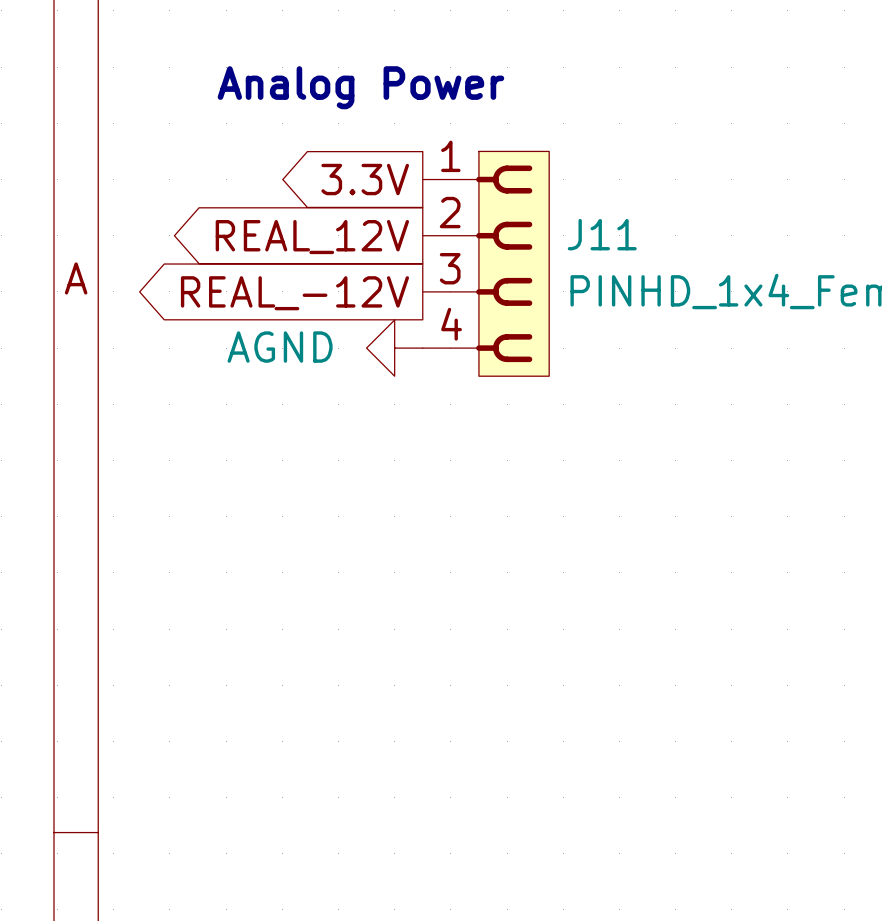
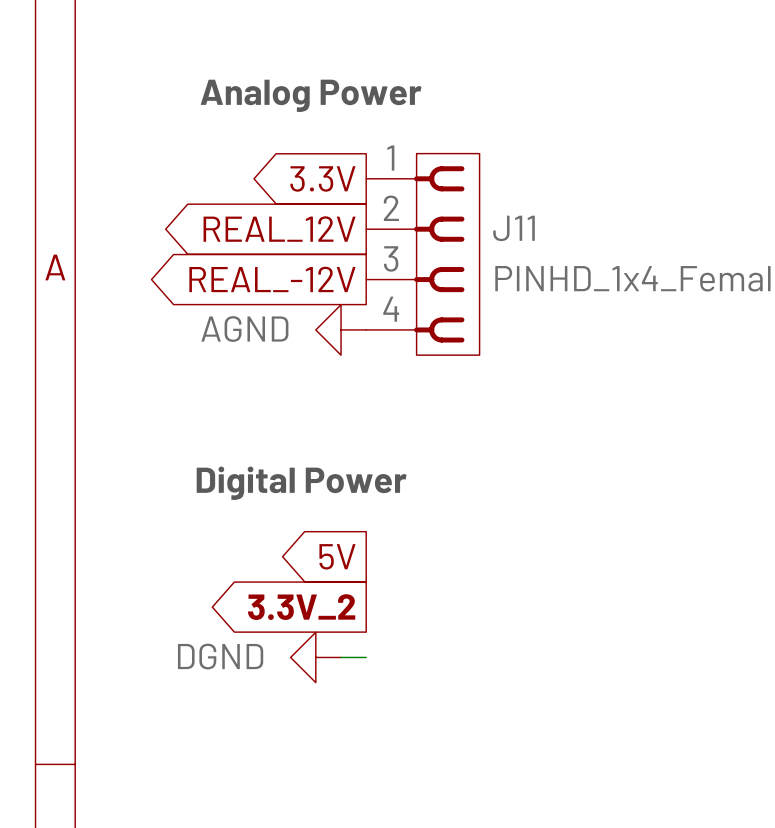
text: none -> Digital Power (301, 483)
global label: none -> 5V (337, 556)
global label: none -> 3.3V_2 (301, 607)
power symbol: none -> DGND (315, 657)
wire: none -> (341, 657) (366, 657)

